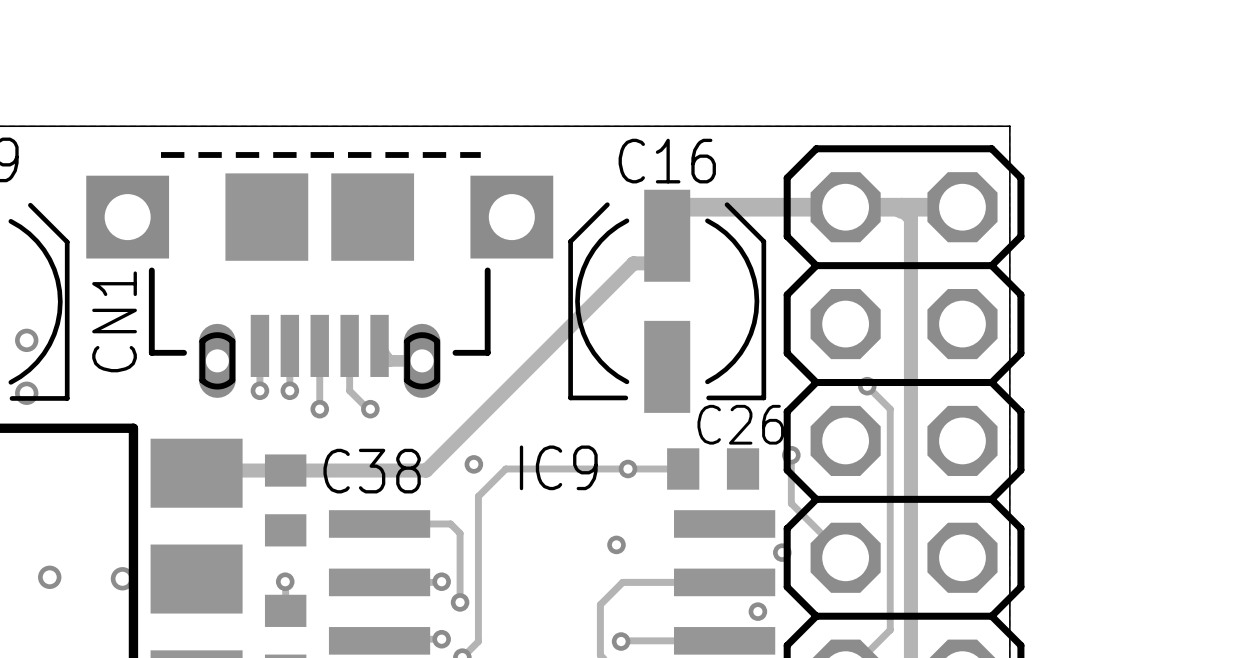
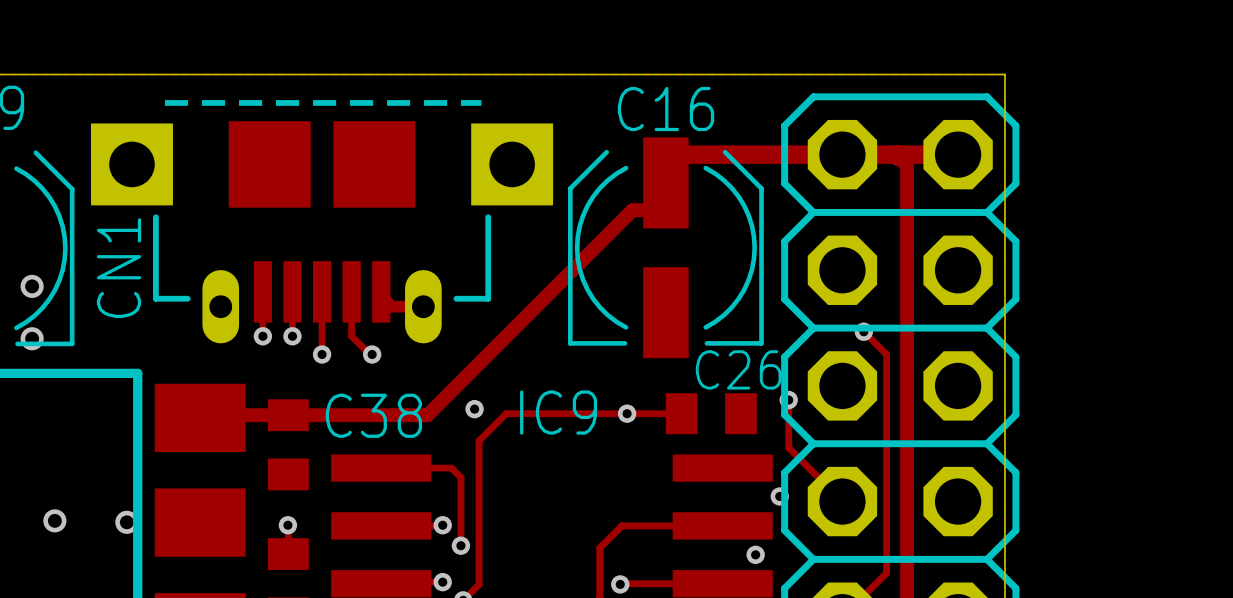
via: (616, 544) -> none

